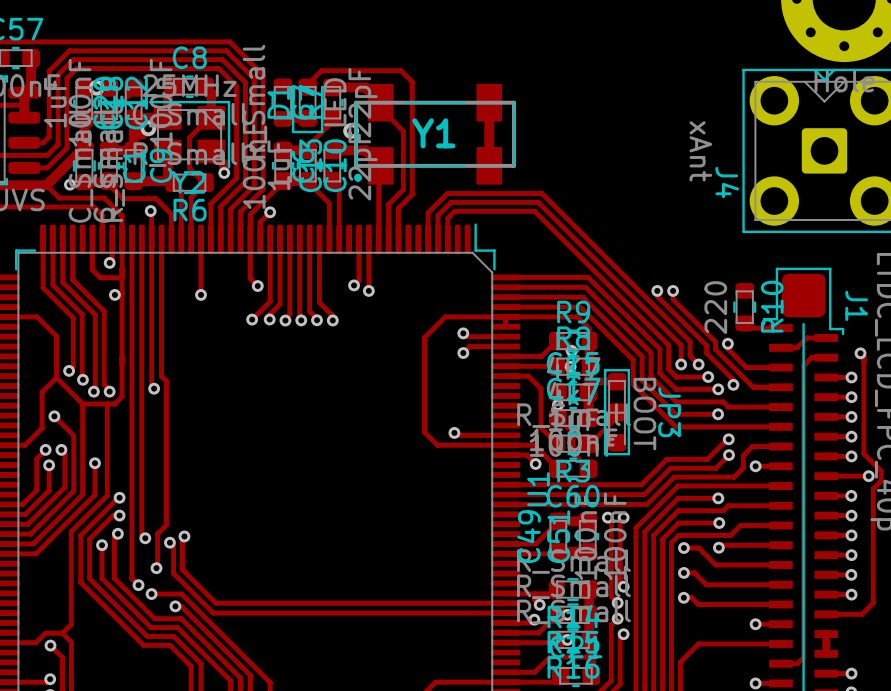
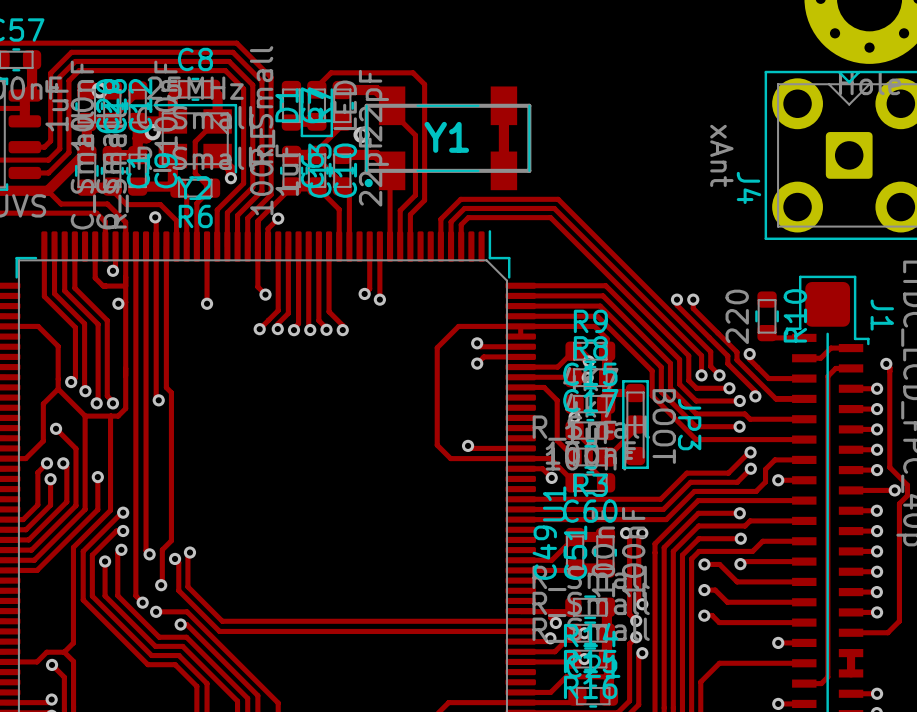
via: (69, 184) -> none

